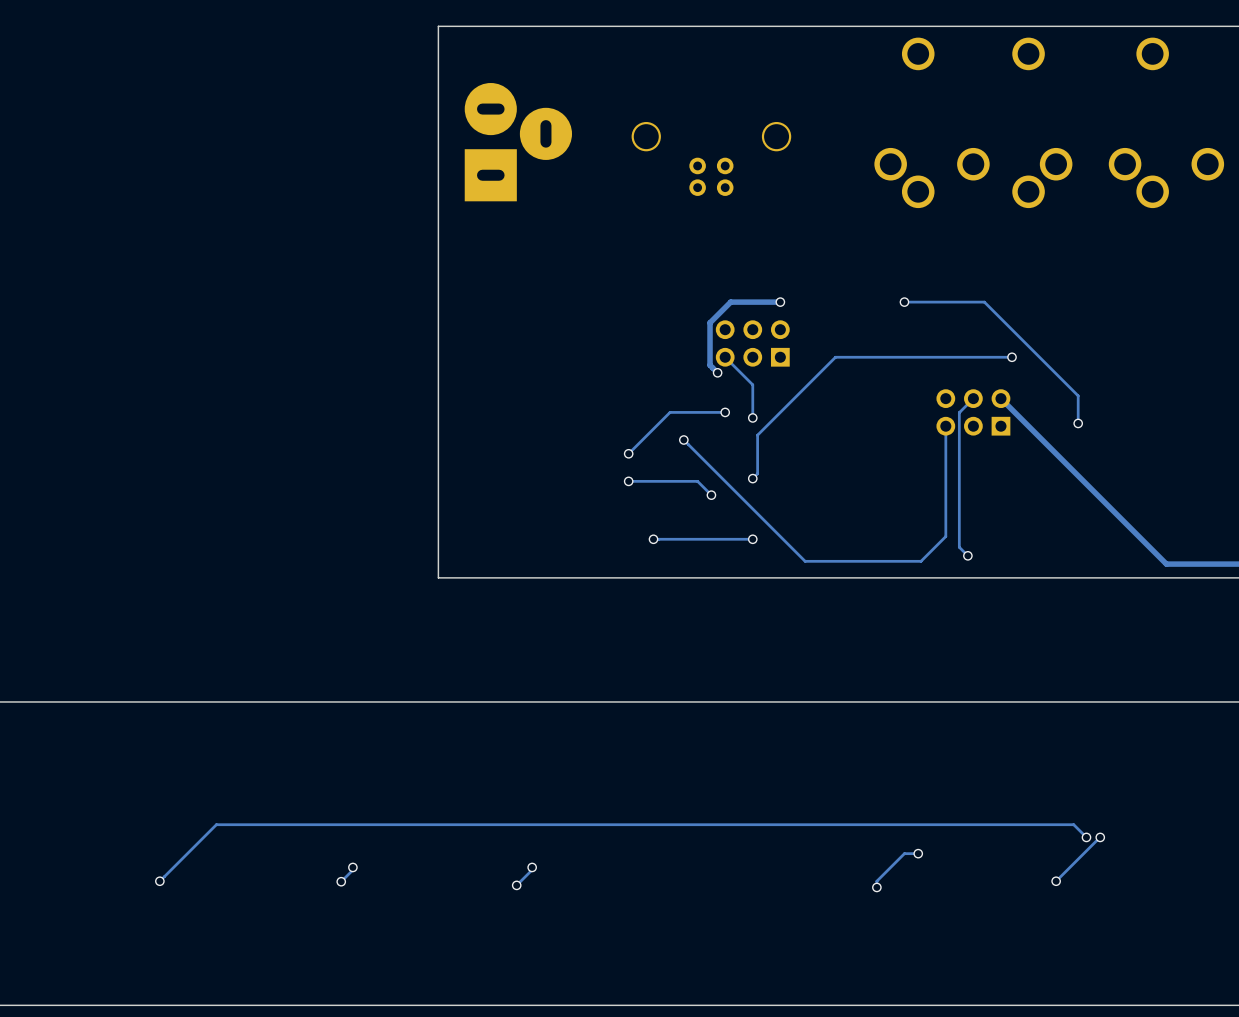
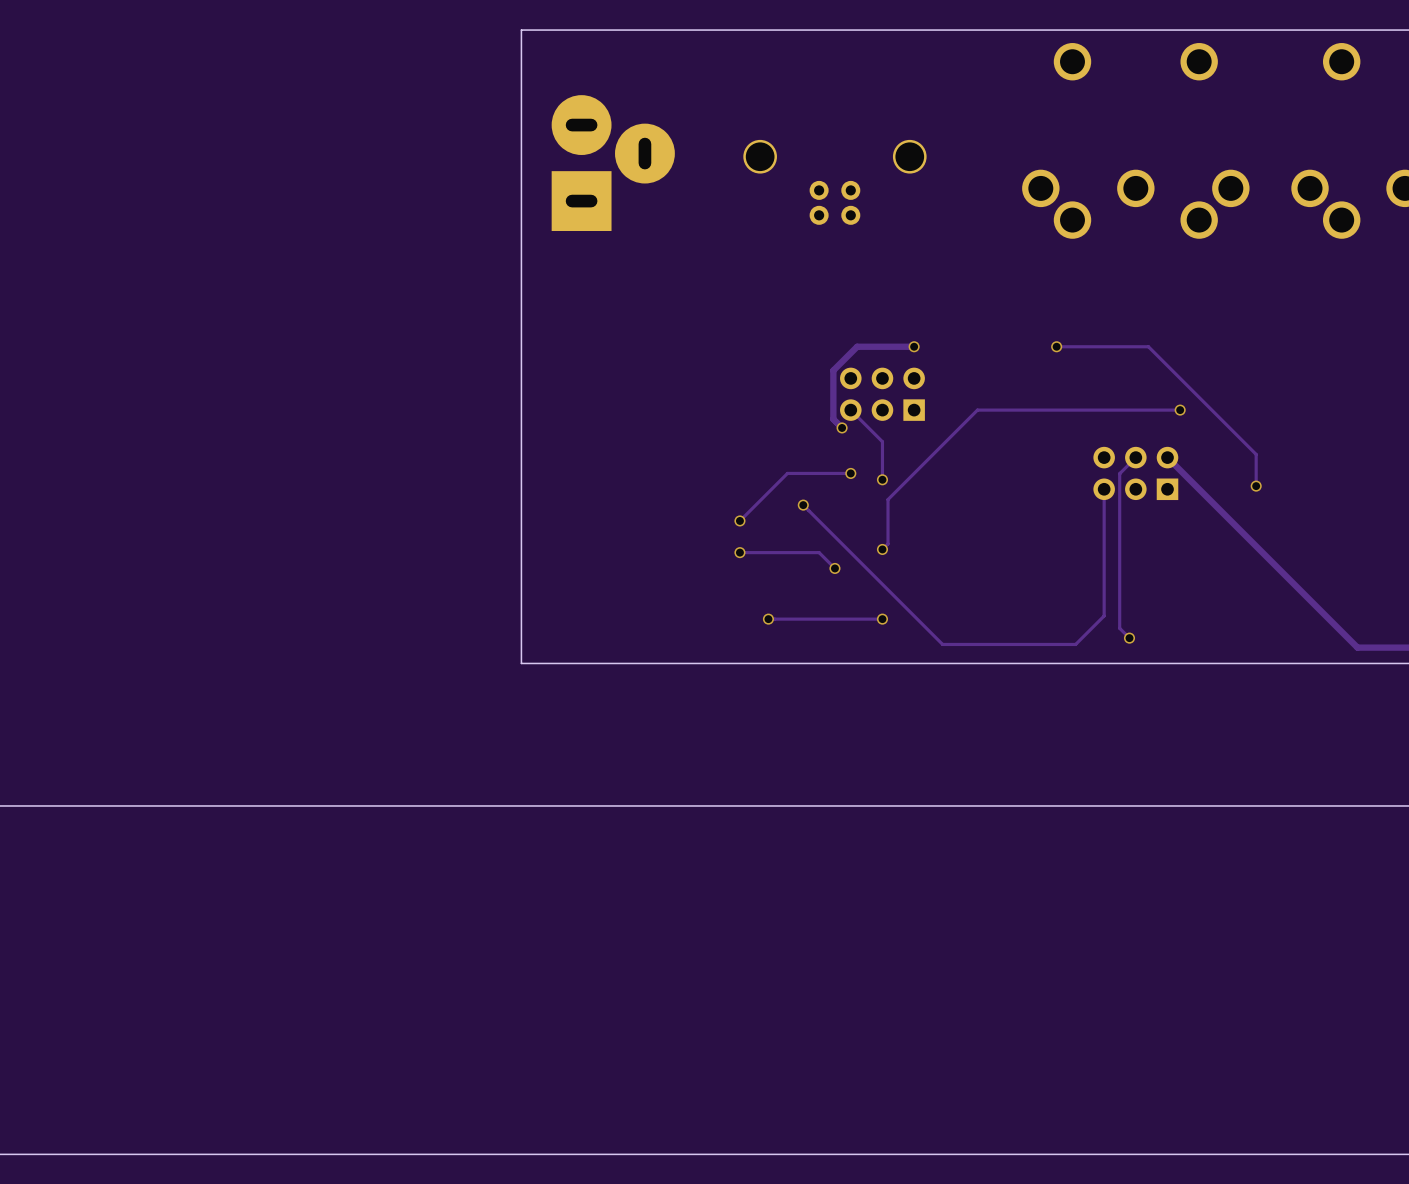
track: (1086, 837) (1073, 824) (216, 824) (159, 881) -> none
via: (1086, 837) -> none
track: (1100, 837) (1056, 881) -> none
via: (1100, 837) -> none
track: (918, 853) (904, 853) (876, 881) (876, 887) -> none
via: (918, 853) -> none
track: (352, 867) (352, 870) (341, 881) -> none
via: (352, 867) -> none
track: (532, 867) (532, 869) (516, 885) -> none
via: (532, 867) -> none
via: (159, 881) -> none
via: (341, 881) -> none
via: (1056, 881) -> none
via: (516, 885) -> none
via: (876, 887) -> none

